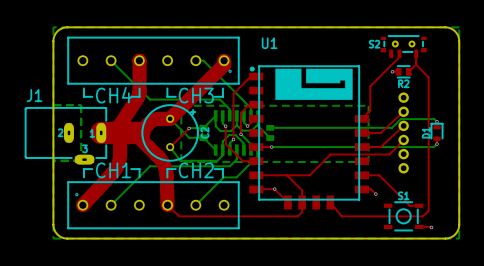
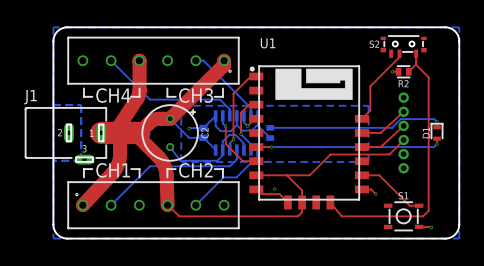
top track: (189, 128) (170, 147) -> none
top track: (274, 189) (279, 194) -> (261, 194) (279, 194)
top track: (274, 189) (256, 189) -> none

